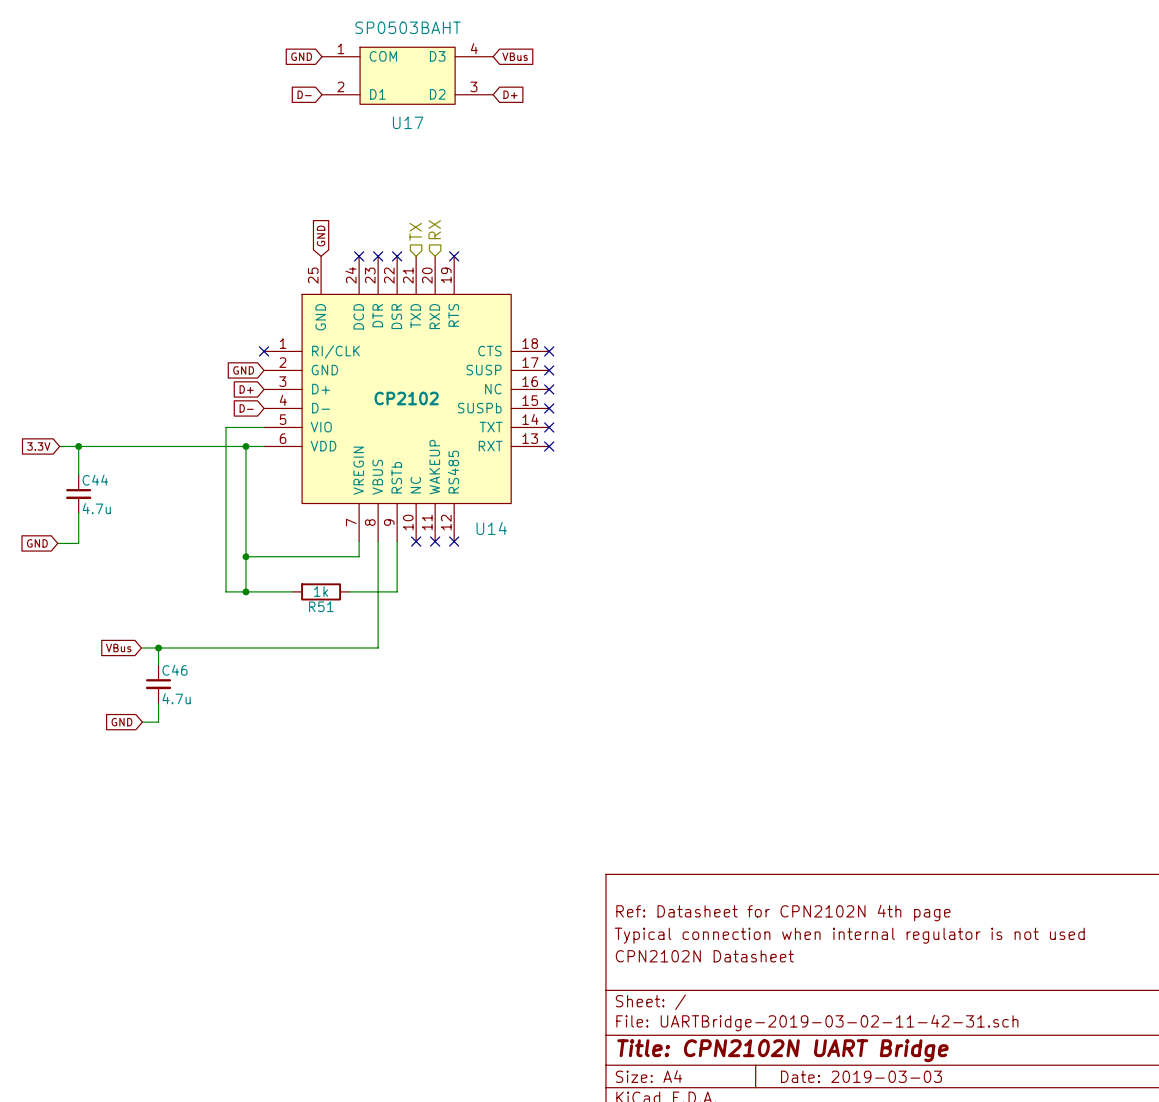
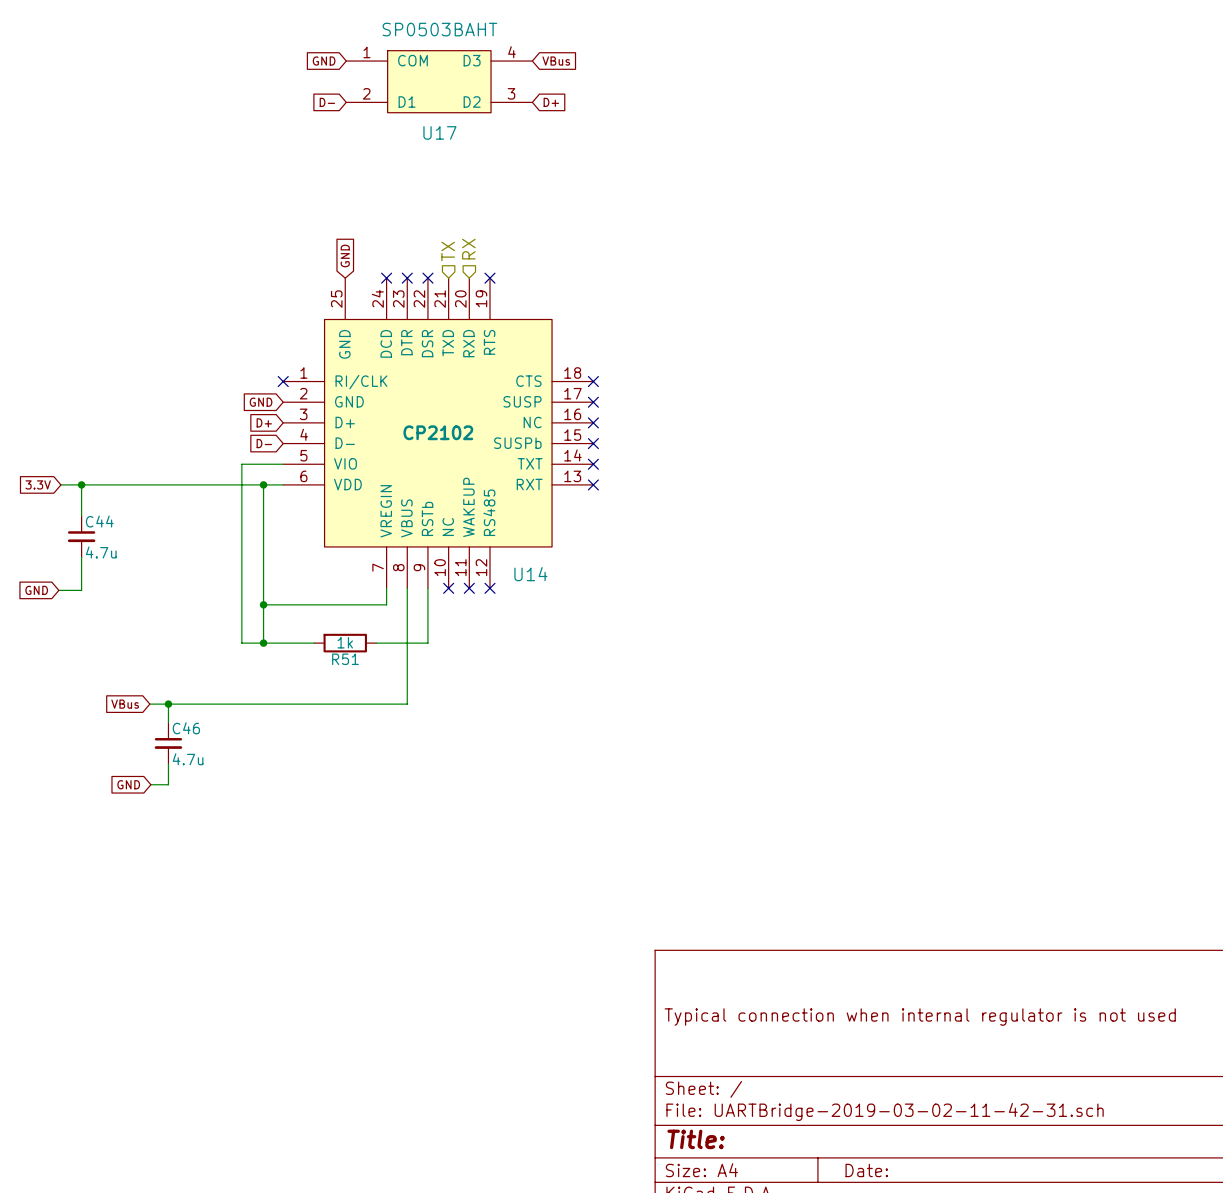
title block: Ref: Datasheet for CPN2102N 4th page (783, 912) -> none
title block: CPN2102N Datasheet (704, 956) -> none
title block: Title: CPN2102N UART Bridge (782, 1050) -> Title: (696, 1139)
title block: Date: 2019-03-03 (861, 1076) -> Date: (866, 1170)

